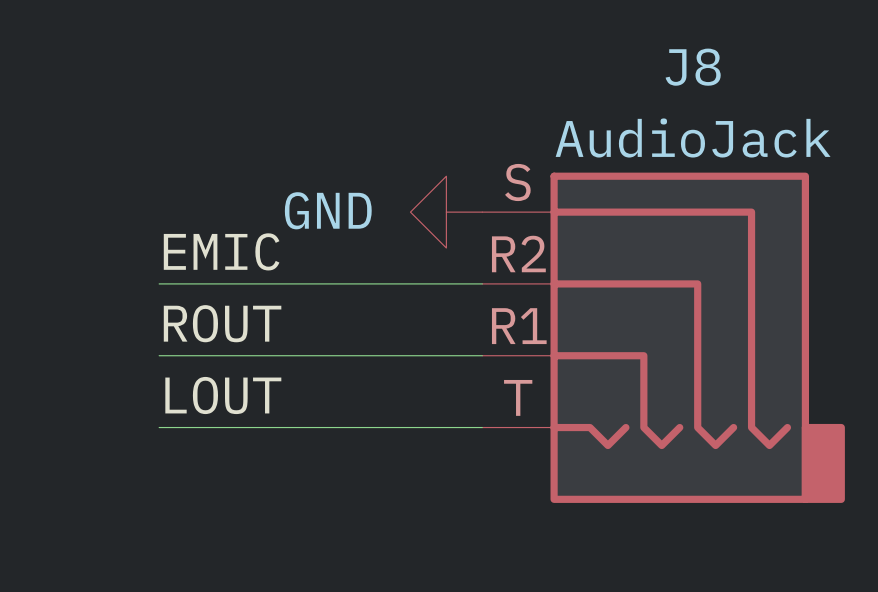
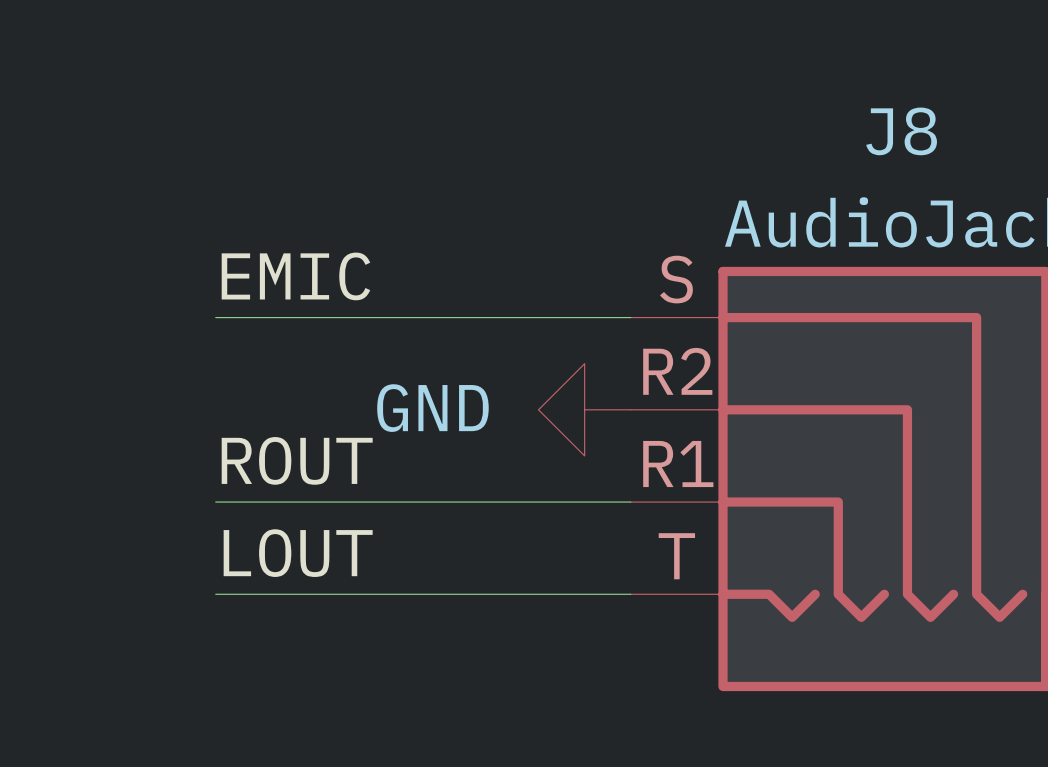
power symbol position: GND (446, 212) -> GND (584, 409)
label position: EMIC (221, 251) -> EMIC (295, 276)
wire: (159, 283) (482, 283) -> (215, 317) (630, 317)

